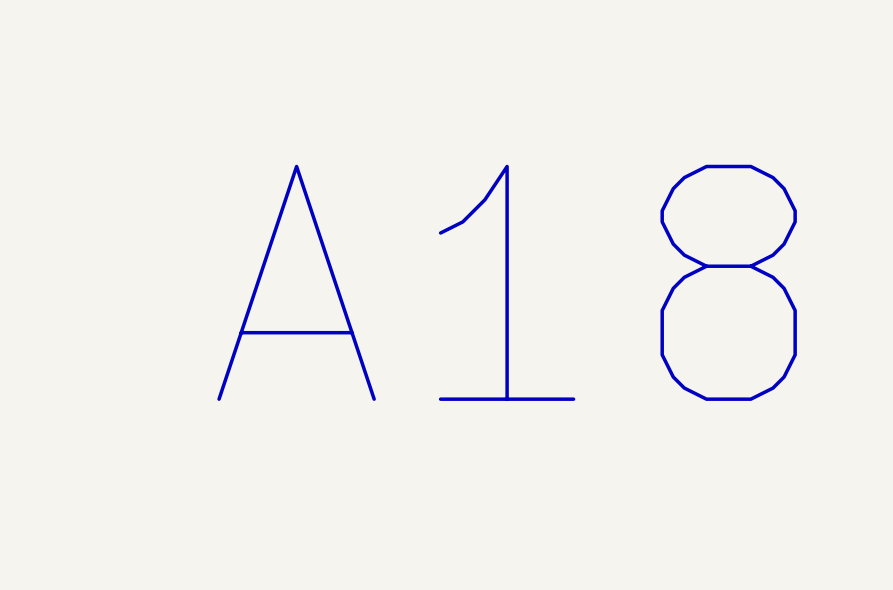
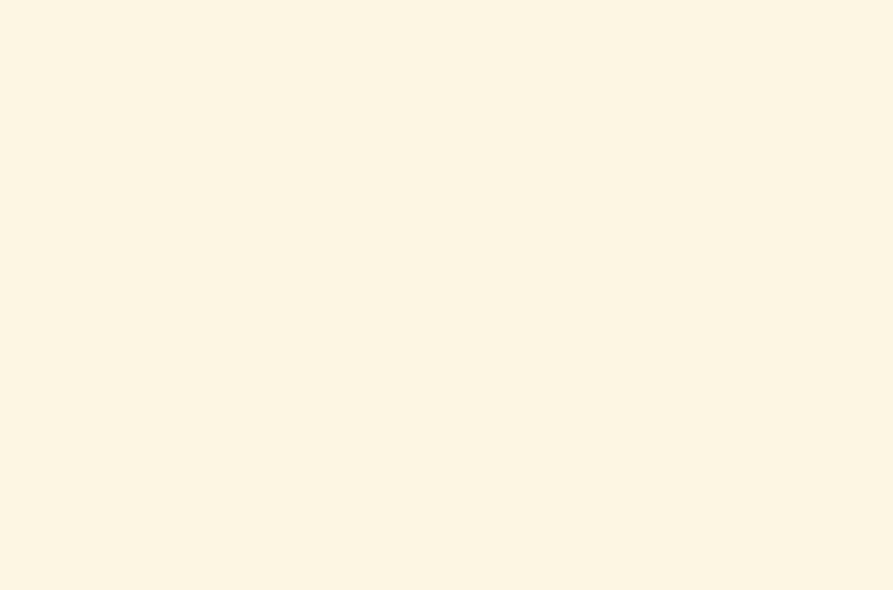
text: A18 (507, 282) -> none

